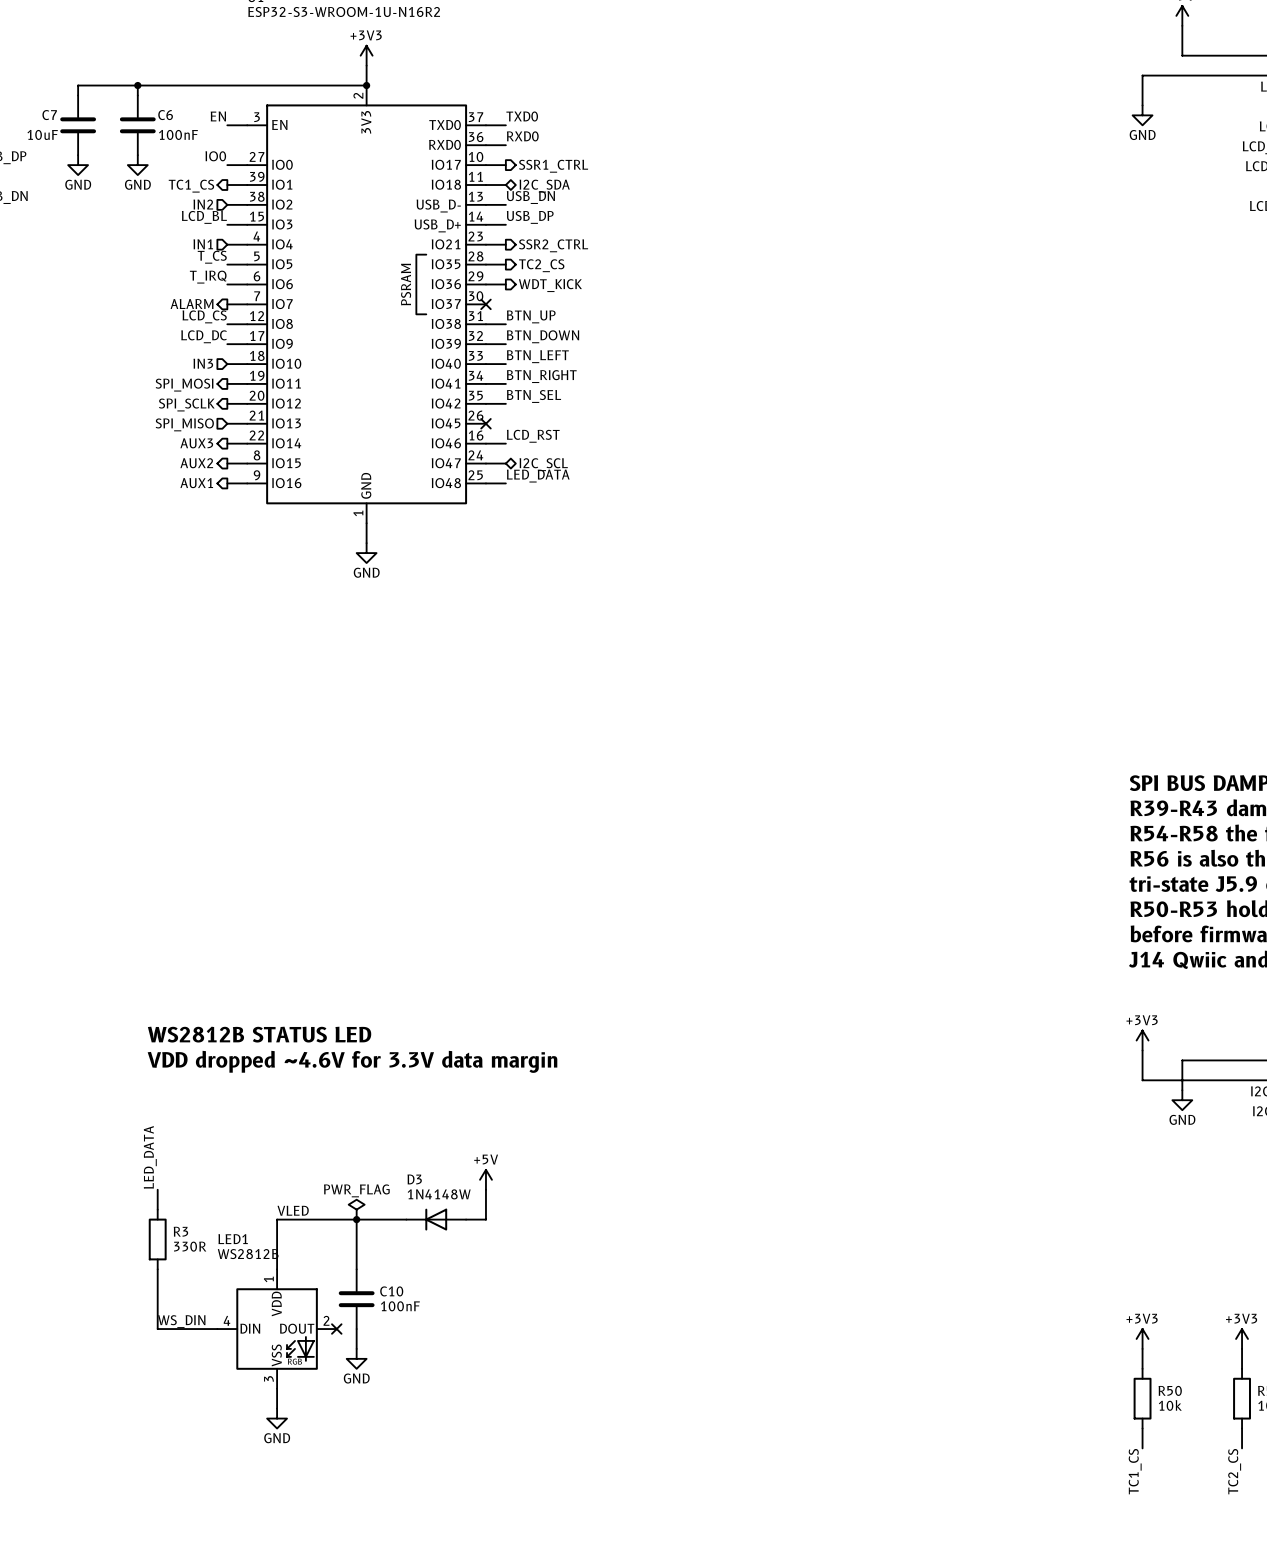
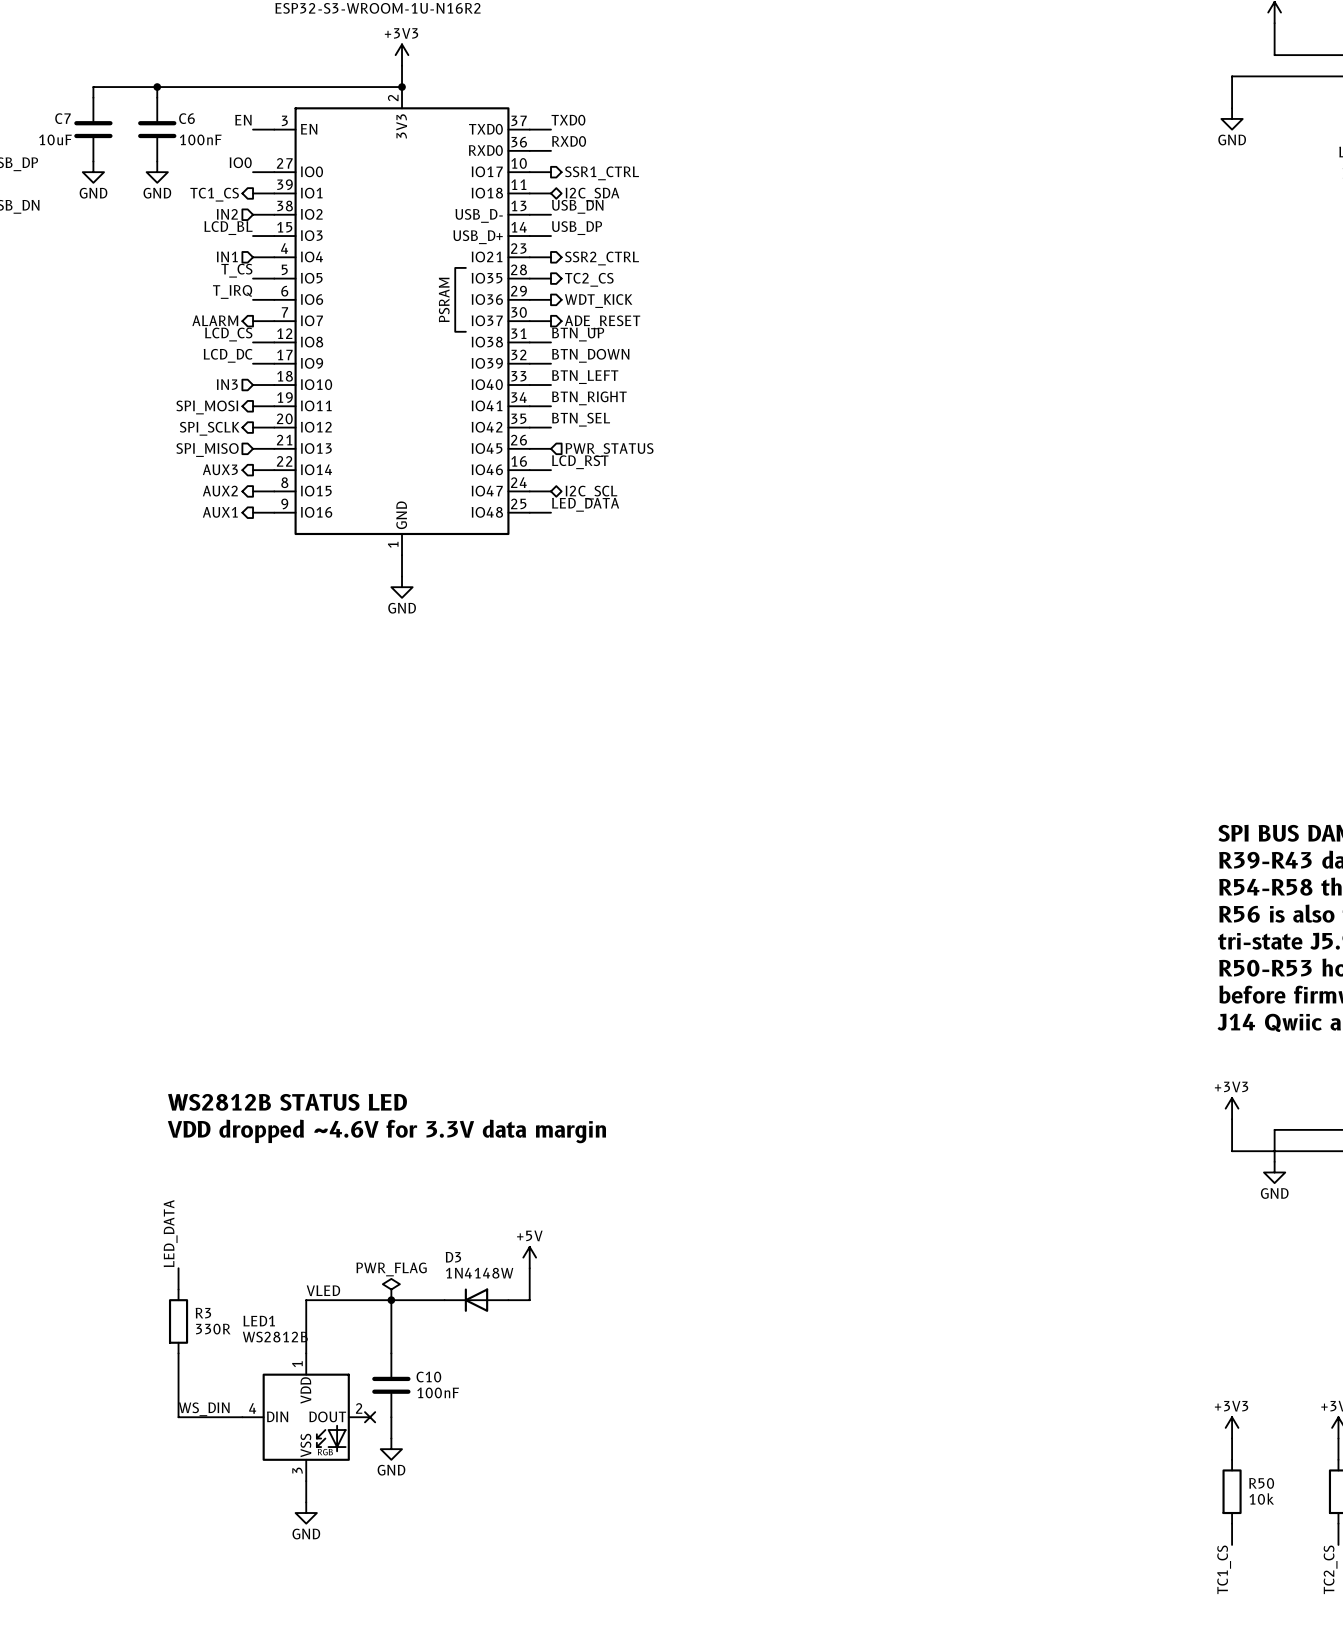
wire: none -> (529, 321) (550, 321)
no-connect mark: (485, 304) -> none
hierarchical label: none -> ADE_RESET (602, 322)
wire: none -> (529, 448) (550, 448)
no-connect mark: (485, 423) -> none
hierarchical label: none -> PWR_STATUS (609, 450)

